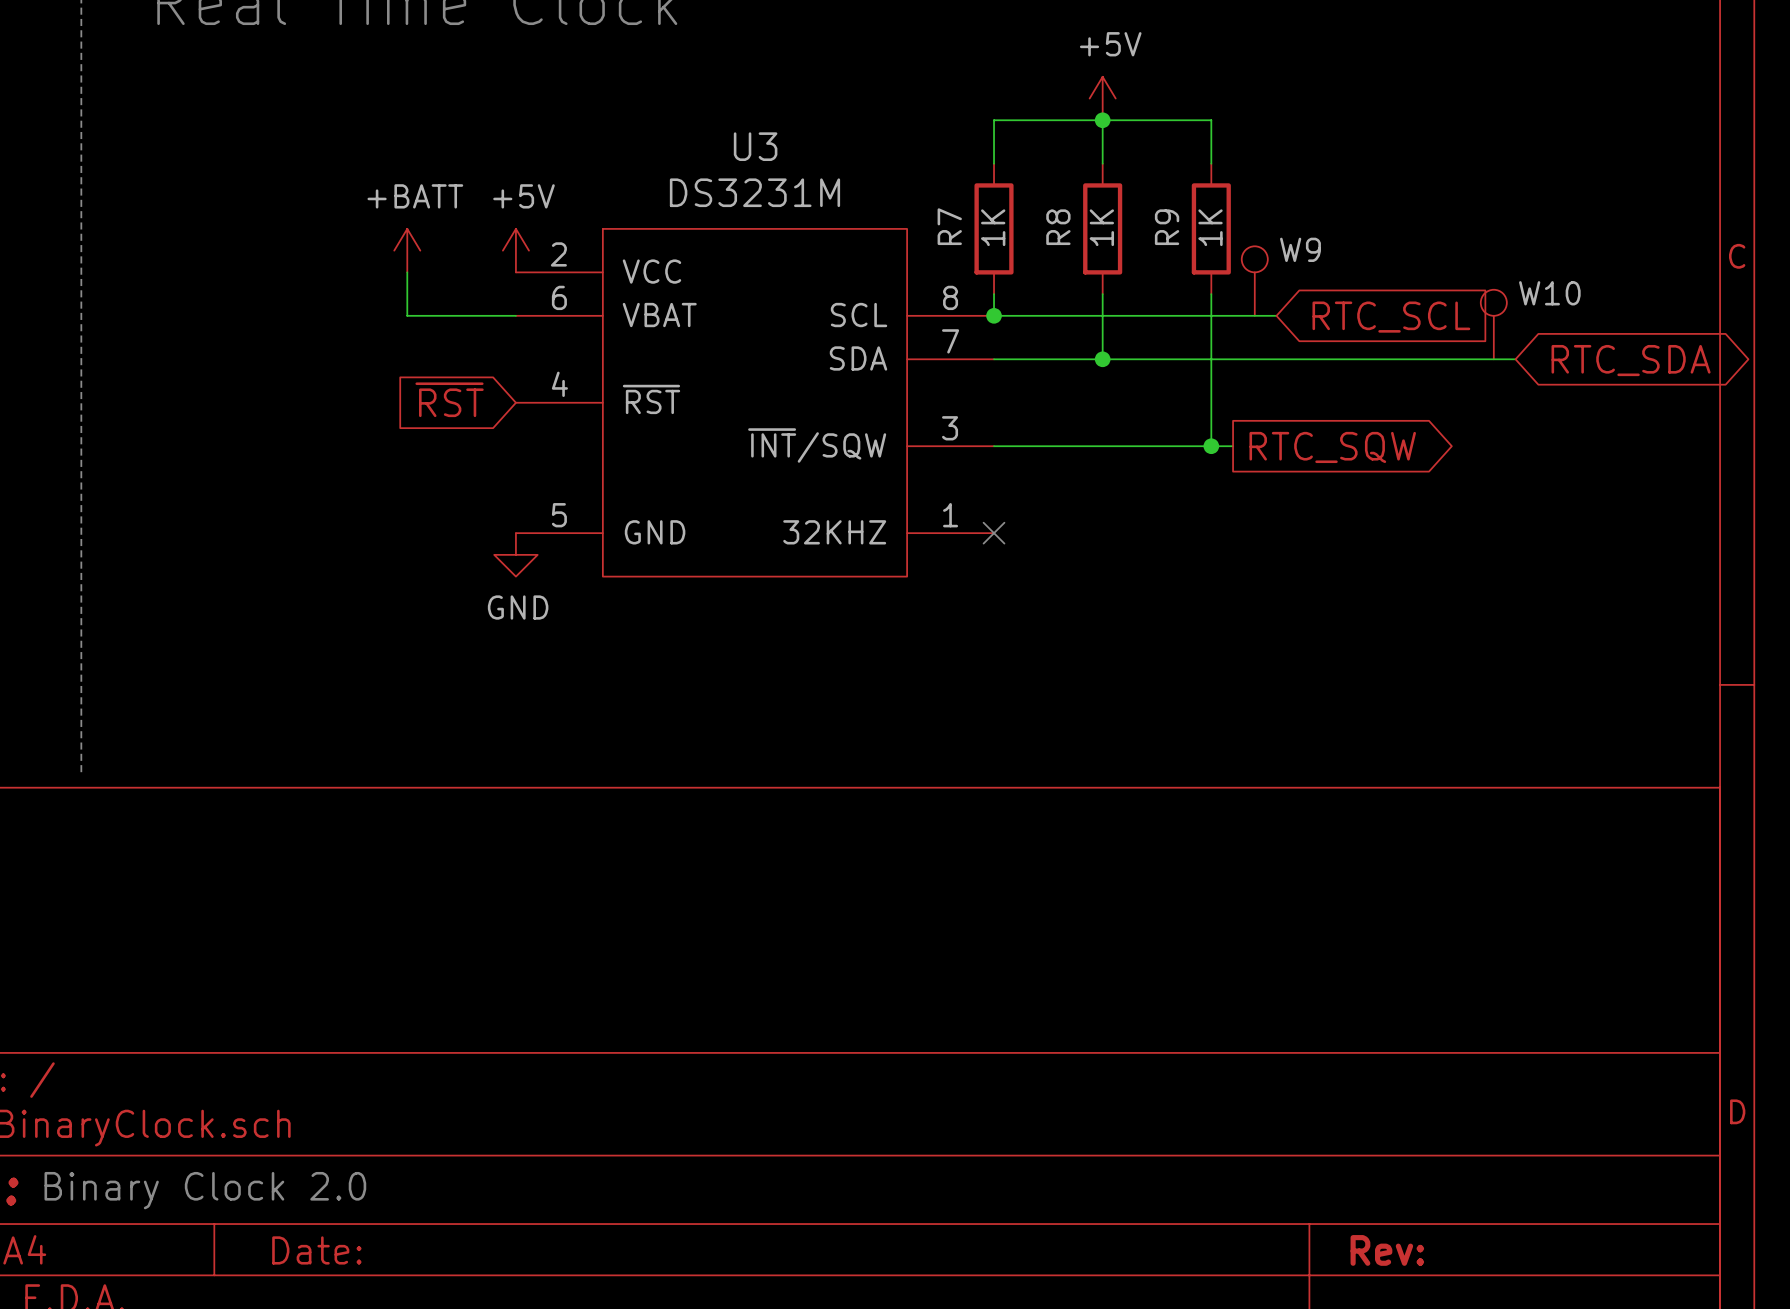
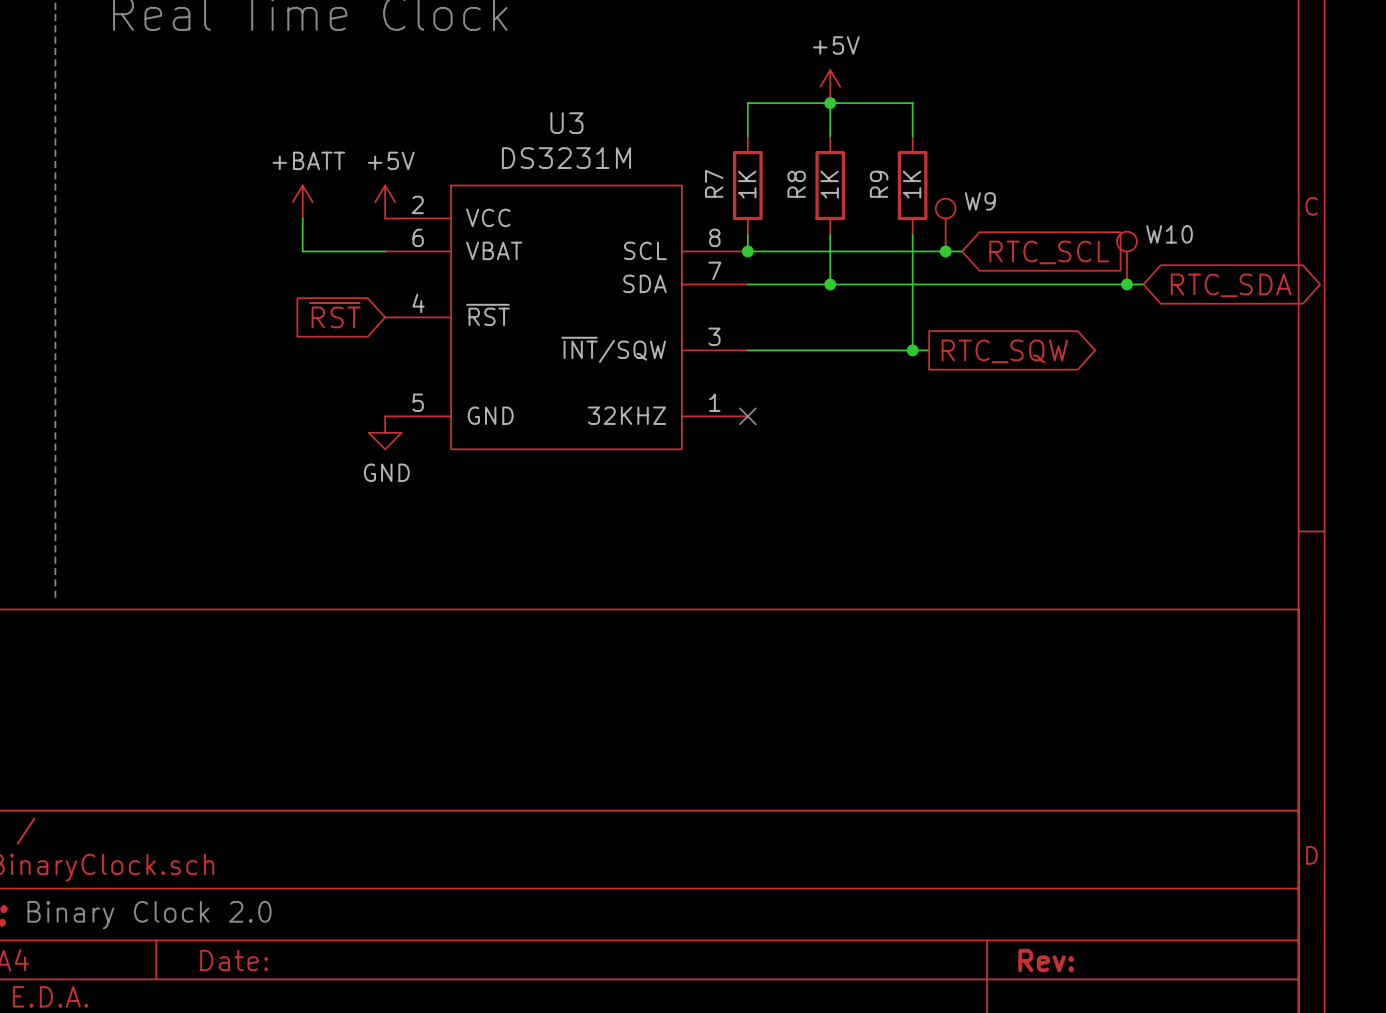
junction: none -> (945, 251)
junction: none -> (1126, 284)

